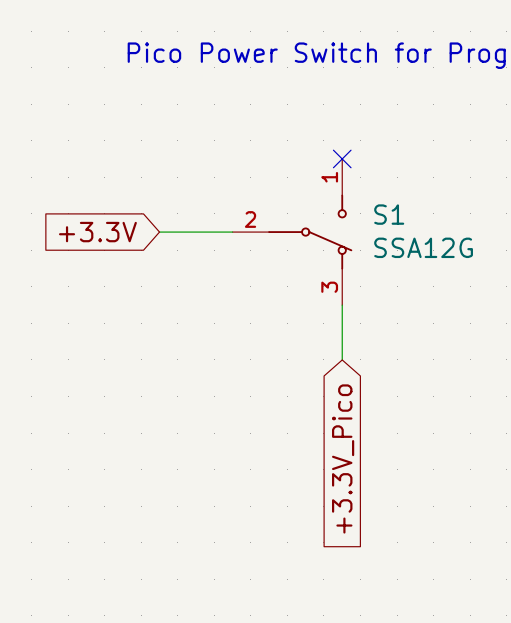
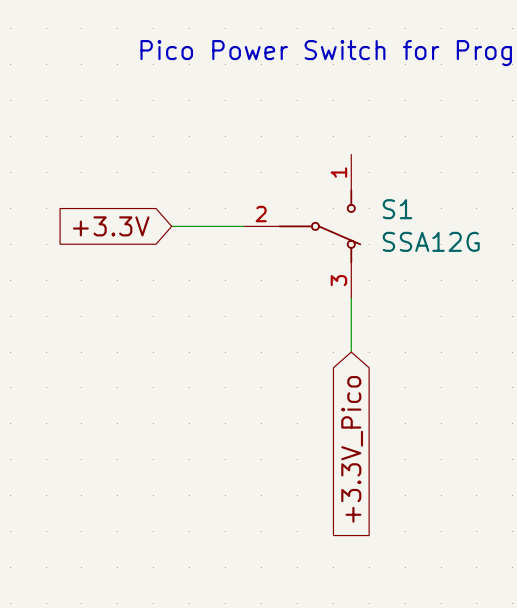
no-connect mark: (342, 158) -> none

